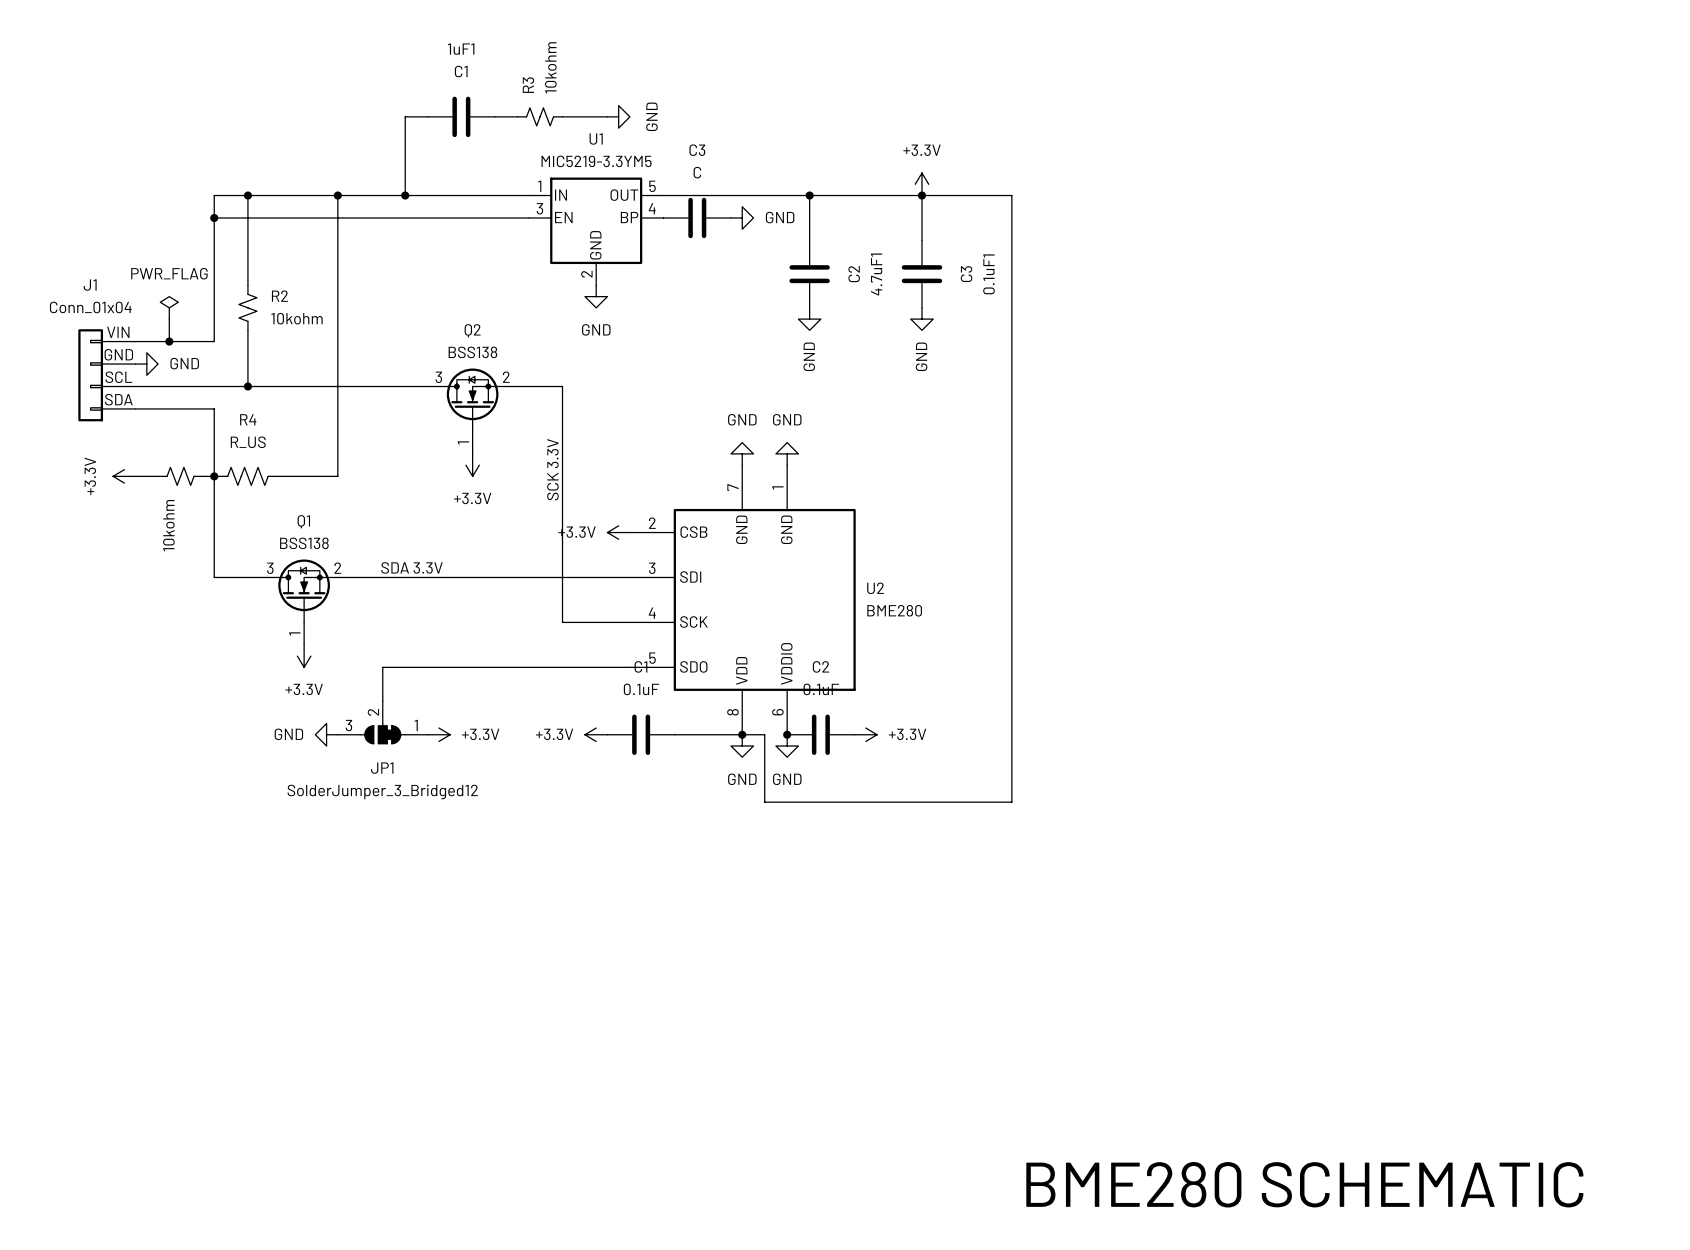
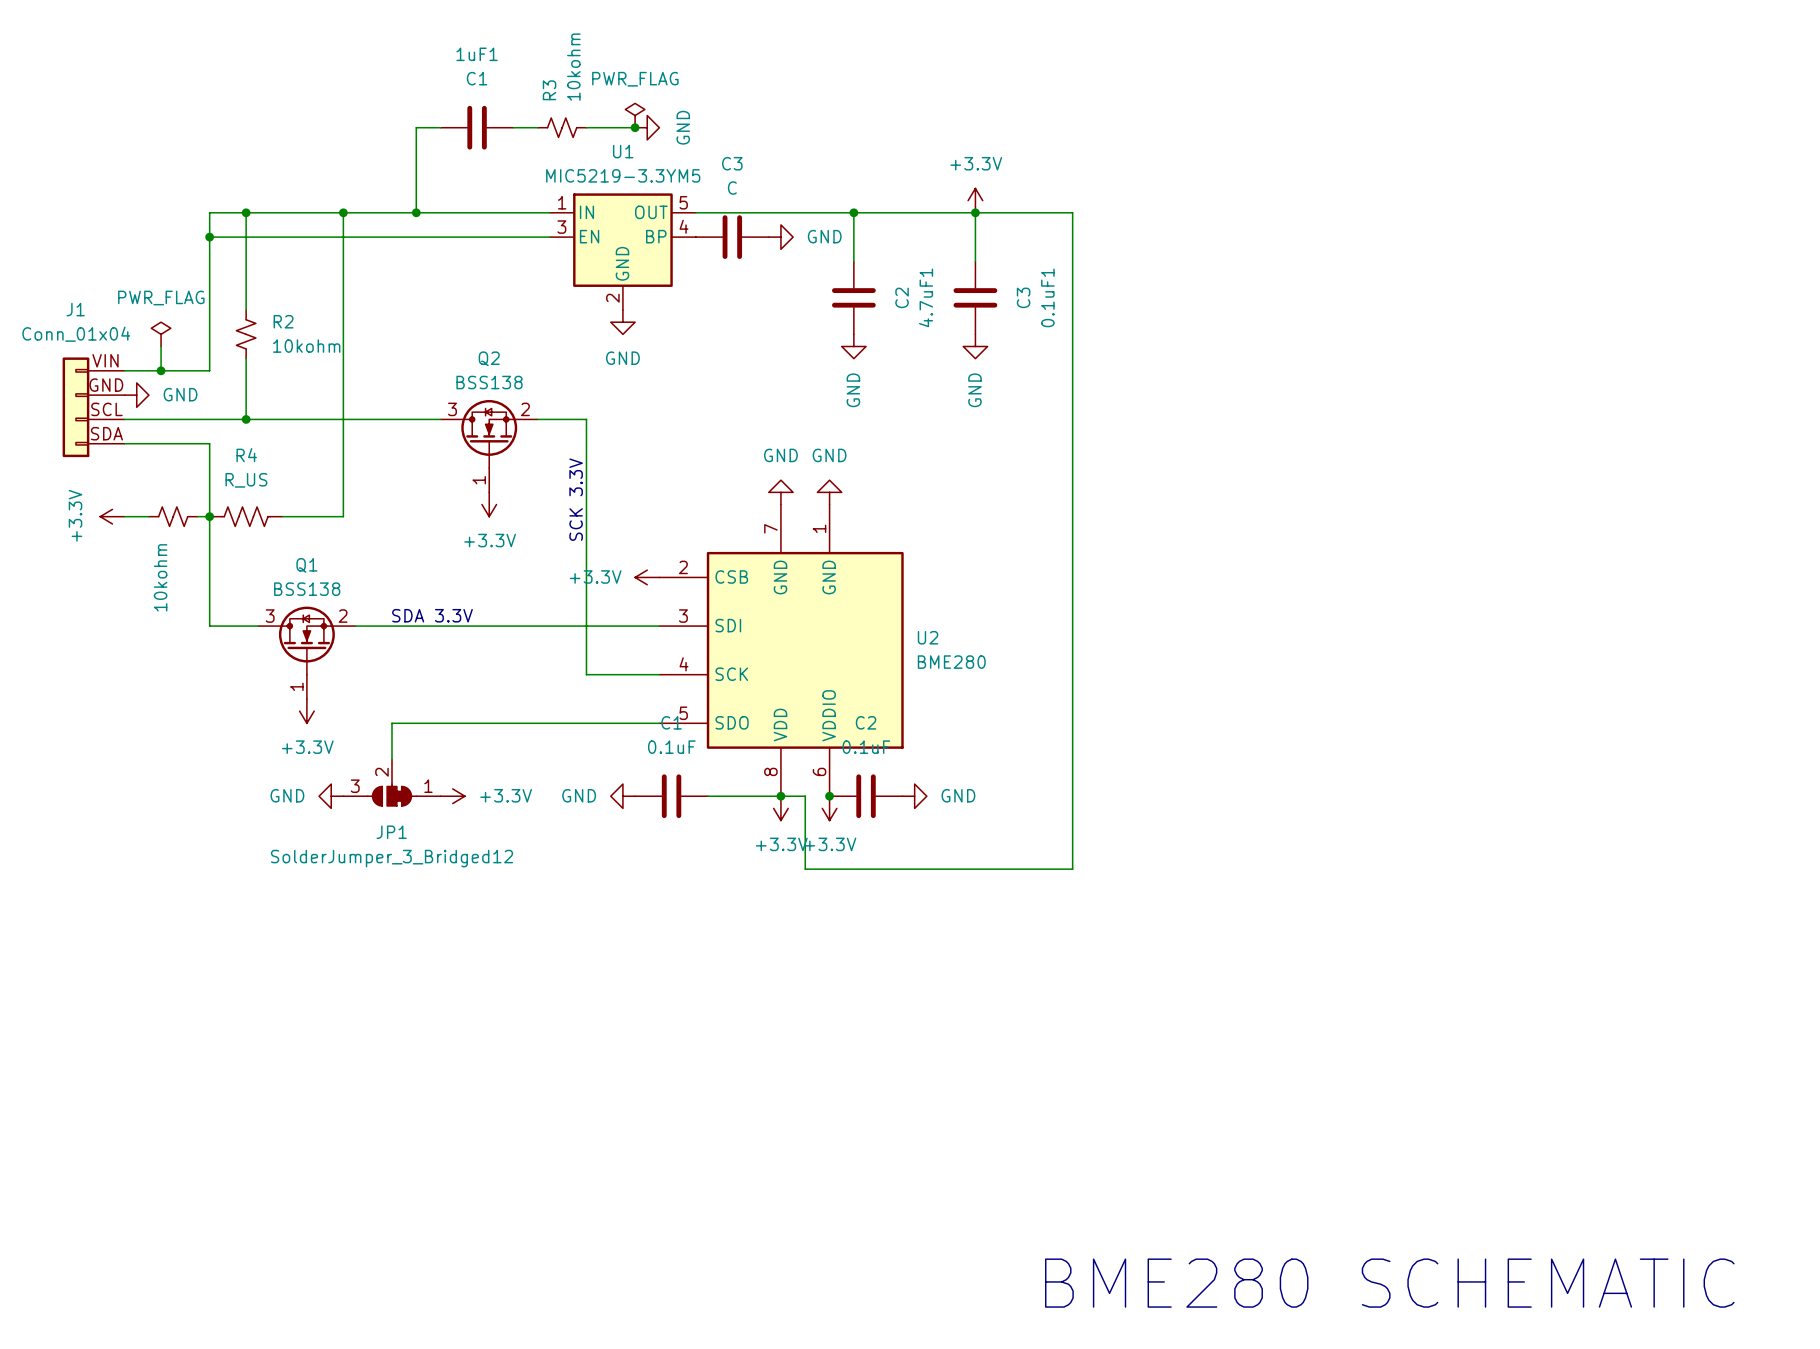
power symbol: none -> PWR_FLAG (635, 115)
junction: none -> (635, 127)
power symbol: +3.3V (596, 734) -> GND (622, 796)
power symbol: +3.3V (865, 734) -> GND (914, 796)
power symbol: GND (742, 745) -> +3.3V (780, 808)
power symbol: GND (787, 745) -> +3.3V (829, 808)

